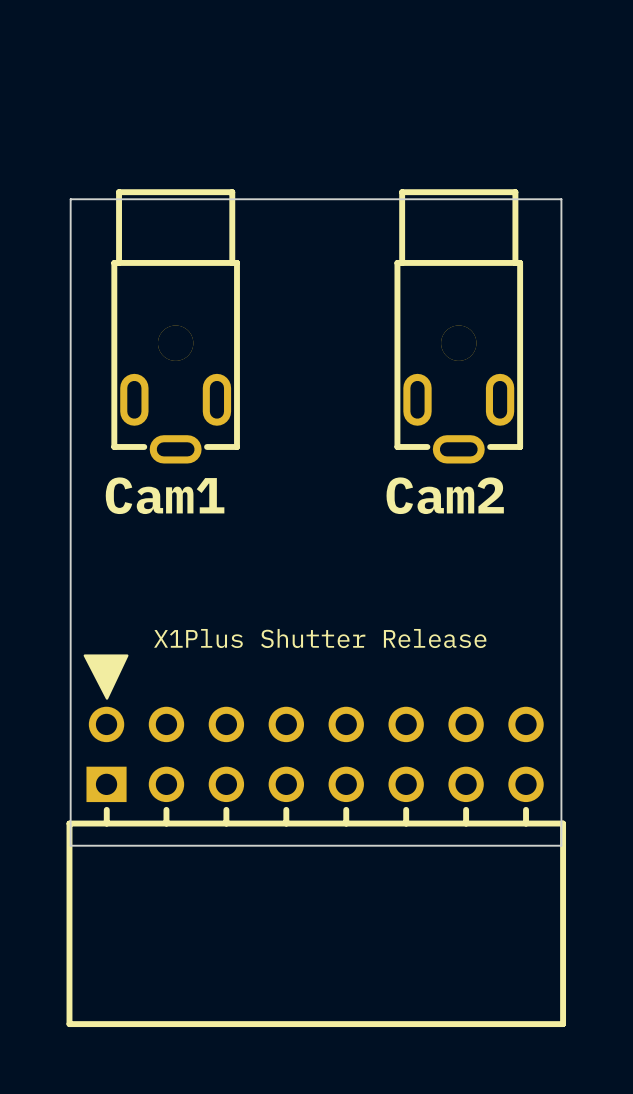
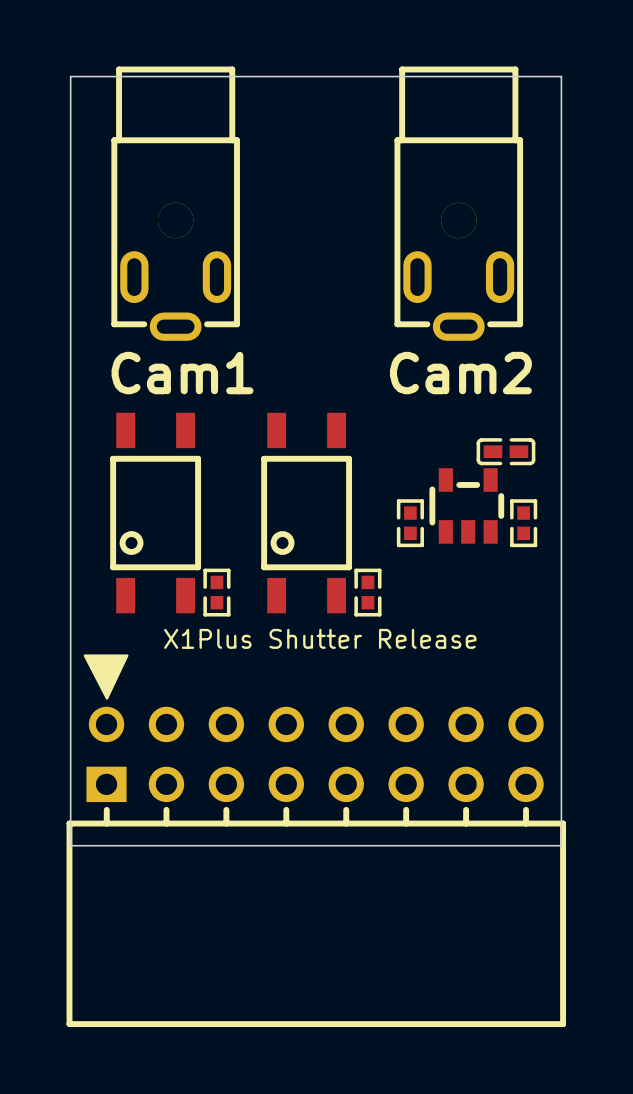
board edge: (70, 199) (561, 199) -> (70, 199) (70, 76) (561, 76) (561, 199)
part position: (175, 326) -> (175, 203)
part position: (458, 326) -> (458, 203)
part: none -> (505, 451)
text position: Cam1 (165, 495) -> Cam1 (182, 373)
text position: Cam2 (445, 495) -> Cam2 (460, 373)
part: none -> (466, 505)
part: none -> (155, 513)
part: none -> (306, 513)
part: none -> (410, 523)
part: none -> (523, 523)
part: none -> (216, 592)
part: none -> (367, 592)

